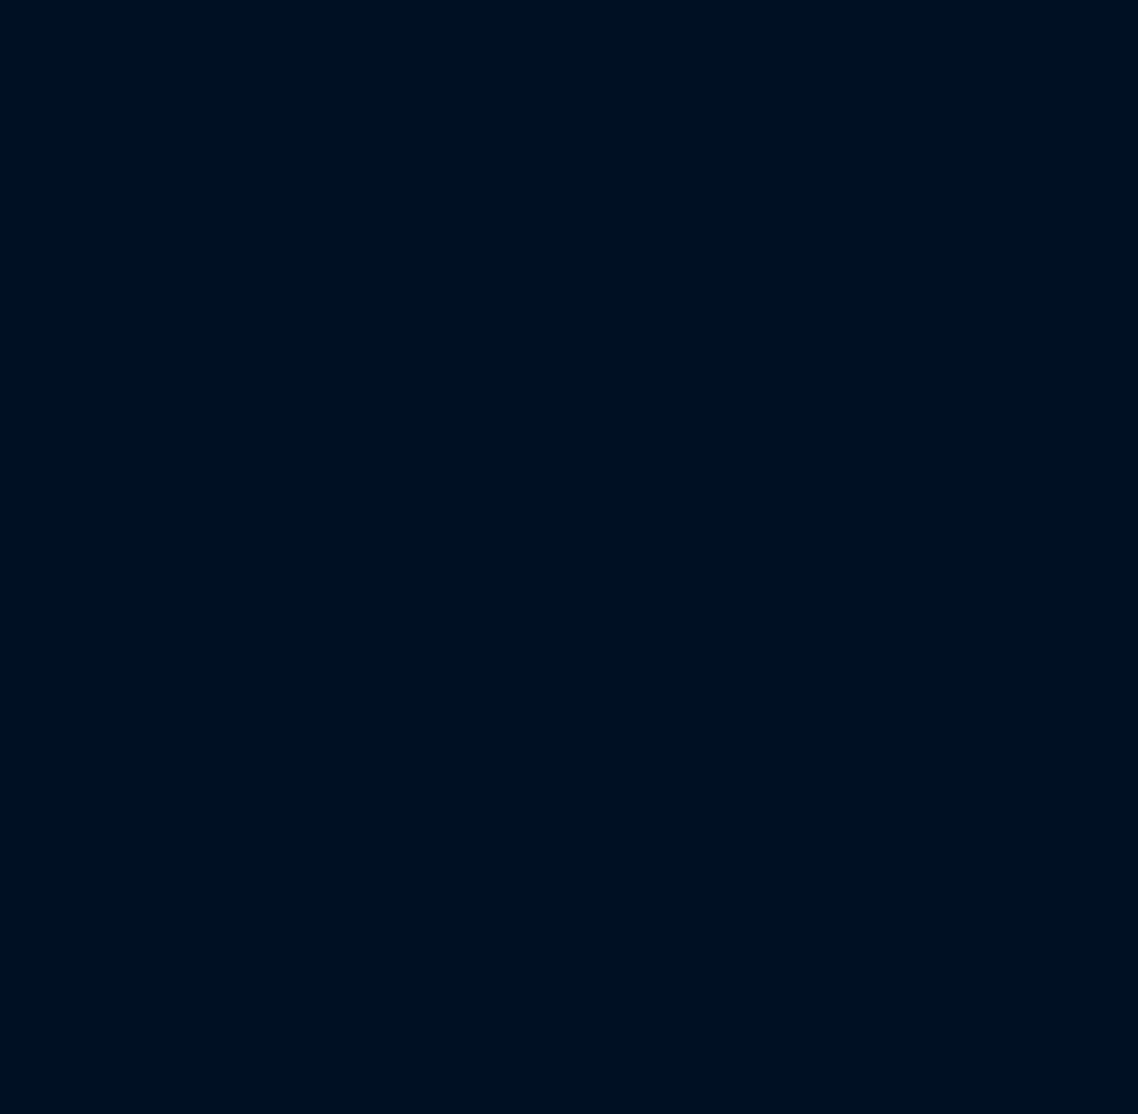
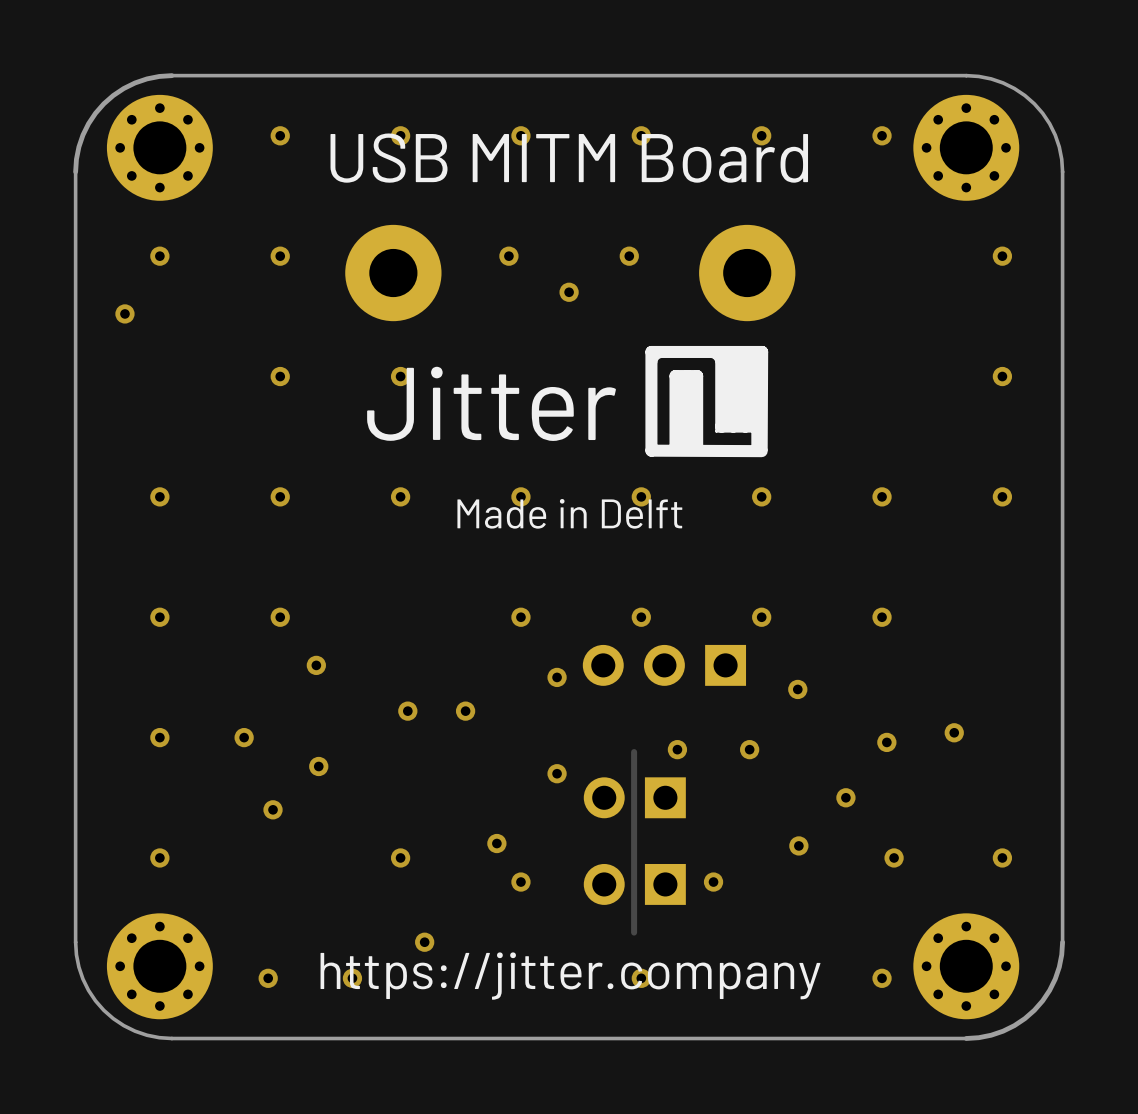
board edge: none -> (966, 75) (171, 75) (146, 78) (135, 82) (113, 95) (103, 103) (88, 123) (82, 135) (78, 146) (75, 171) (75, 942) (78, 967) (82, 979) (88, 990) (103, 1010) (123, 1025) (135, 1031) (146, 1035) (171, 1038) (966, 1038) (991, 1035) (1003, 1031) (1014, 1025) (1034, 1010) (1042, 1000) (1055, 979) (1059, 967) (1062, 942) (1061, 159) (1059, 146) (1049, 123) (1042, 113) (1024, 95) (1003, 82) (991, 78) (966, 75)
via: none -> (280, 135)
via: none -> (400, 135)
via: none -> (520, 135)
via: none -> (641, 135)
via: none -> (761, 135)
via: none -> (882, 135)
part: none -> (159, 147)
part: none -> (966, 147)
text: none -> USB MITM Board (569, 158)
via: none -> (159, 256)
via: none -> (280, 256)
via: none -> (508, 256)
via: none -> (629, 256)
via: none -> (1002, 256)
part: none -> (393, 273)
part: none -> (747, 273)
via: none -> (569, 292)
via: none -> (124, 313)
drawing: none -> [645, 345, 769, 458]
via: none -> (280, 376)
via: none -> (400, 376)
via: none -> (1002, 376)
text: none -> Jitter (491, 403)
via: none -> (159, 496)
via: none -> (280, 496)
via: none -> (400, 496)
via: none -> (520, 496)
via: none -> (641, 496)
via: none -> (761, 496)
via: none -> (882, 496)
via: none -> (1002, 496)
text: none -> Made in Delft (569, 513)
via: none -> (159, 617)
via: none -> (280, 617)
via: none -> (520, 617)
via: none -> (641, 617)
via: none -> (761, 617)
via: none -> (882, 617)
via: none -> (316, 665)
part: none -> (664, 665)
via: none -> (557, 677)
via: none -> (797, 689)
via: none -> (407, 711)
via: none -> (465, 711)
via: none -> (954, 732)
via: none -> (159, 737)
via: none -> (244, 737)
via: none -> (886, 742)
via: none -> (677, 749)
via: none -> (749, 749)
track: none -> (634, 752) (634, 932)
via: none -> (318, 766)
via: none -> (557, 773)
part: none -> (634, 797)
via: none -> (845, 797)
via: none -> (273, 809)
via: none -> (496, 843)
via: none -> (798, 845)
via: none -> (159, 857)
via: none -> (400, 857)
via: none -> (894, 857)
via: none -> (1002, 857)
via: none -> (520, 882)
via: none -> (713, 882)
part: none -> (634, 884)
via: none -> (424, 942)
part: none -> (159, 966)
part: none -> (966, 966)
text: none -> https://jitter.company (570, 976)
via: none -> (268, 978)
via: none -> (352, 978)
via: none -> (641, 978)
via: none -> (882, 978)

